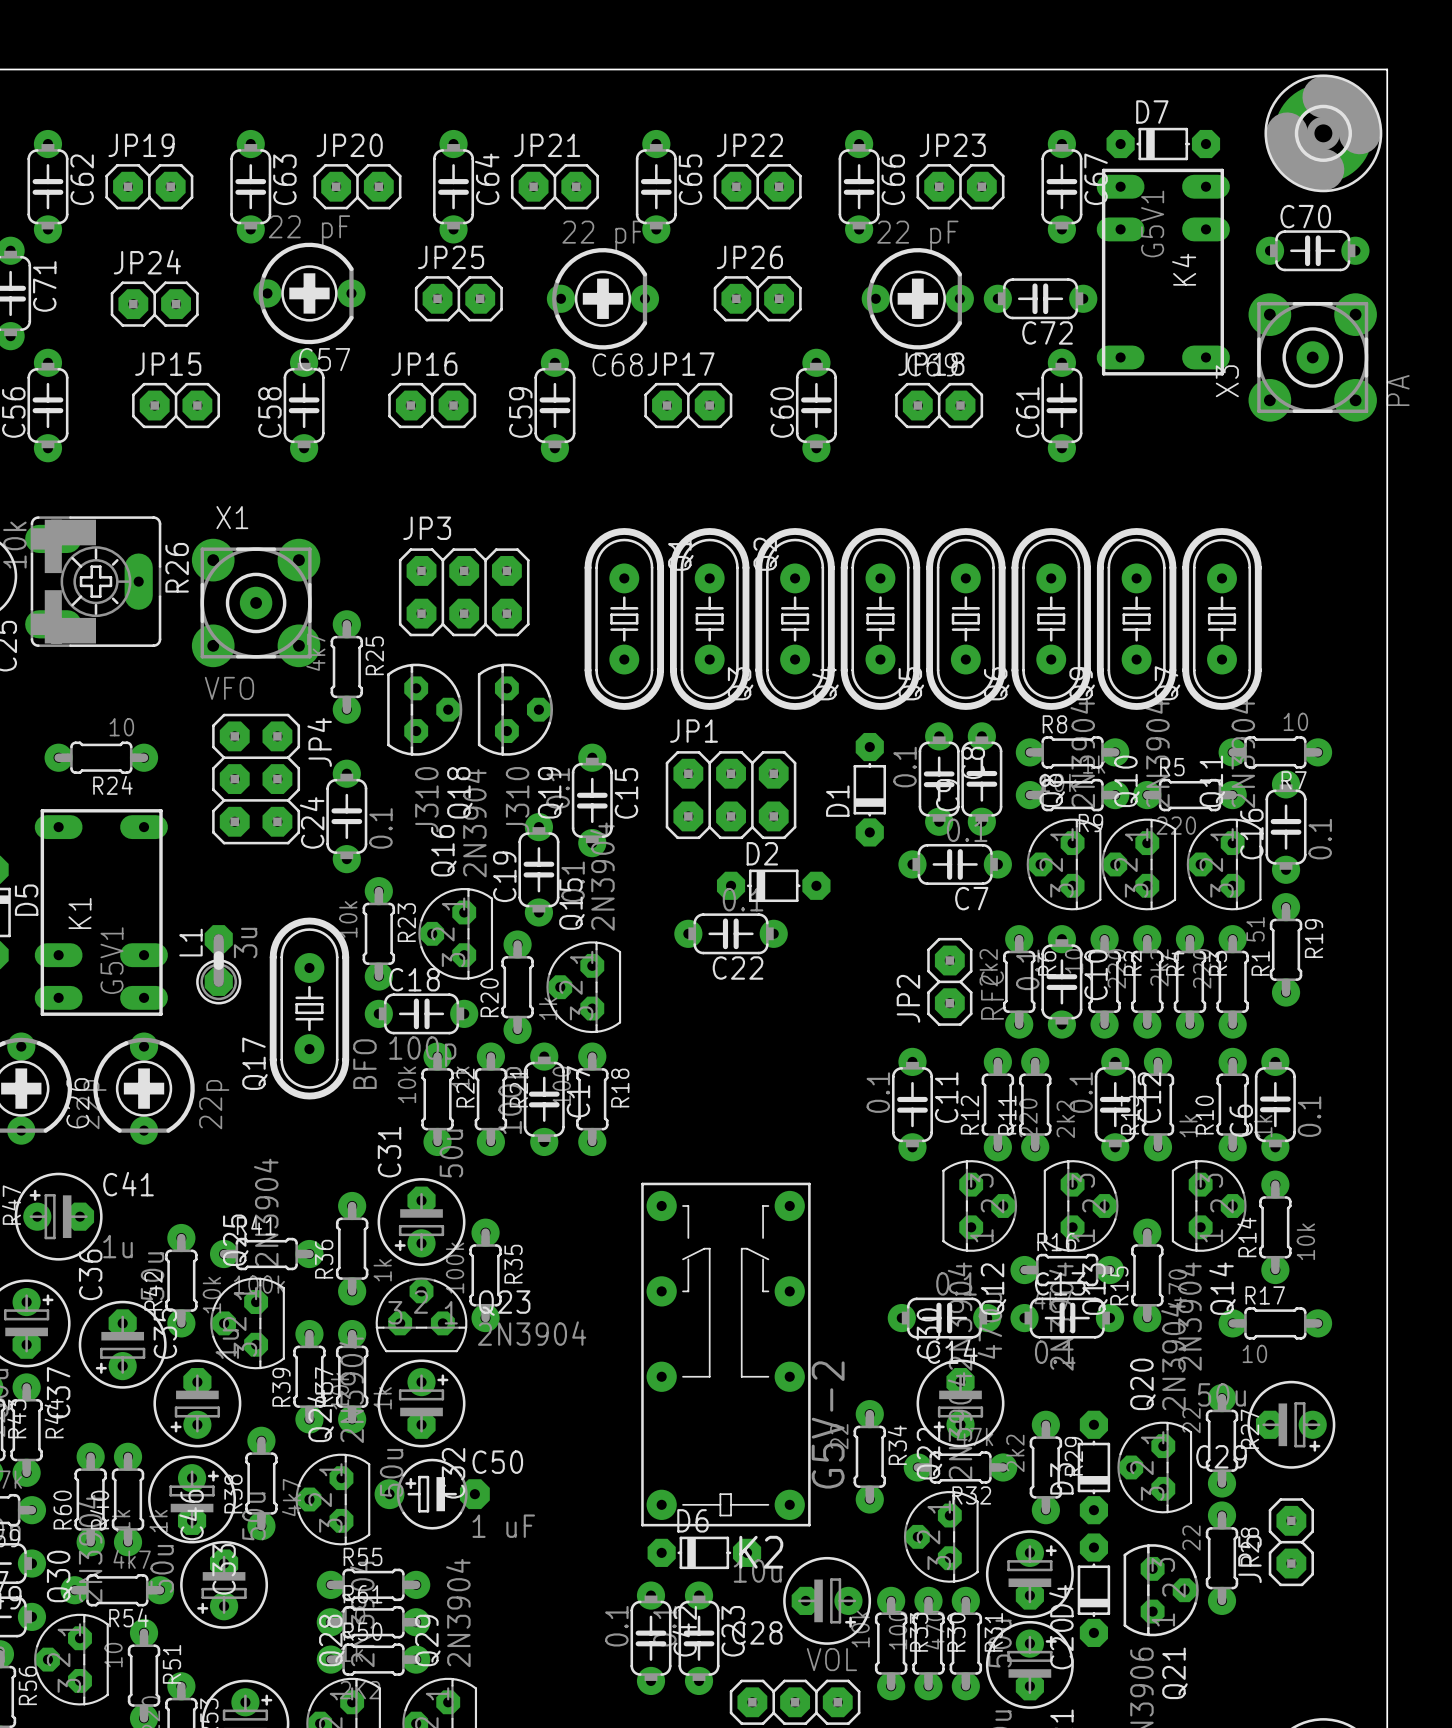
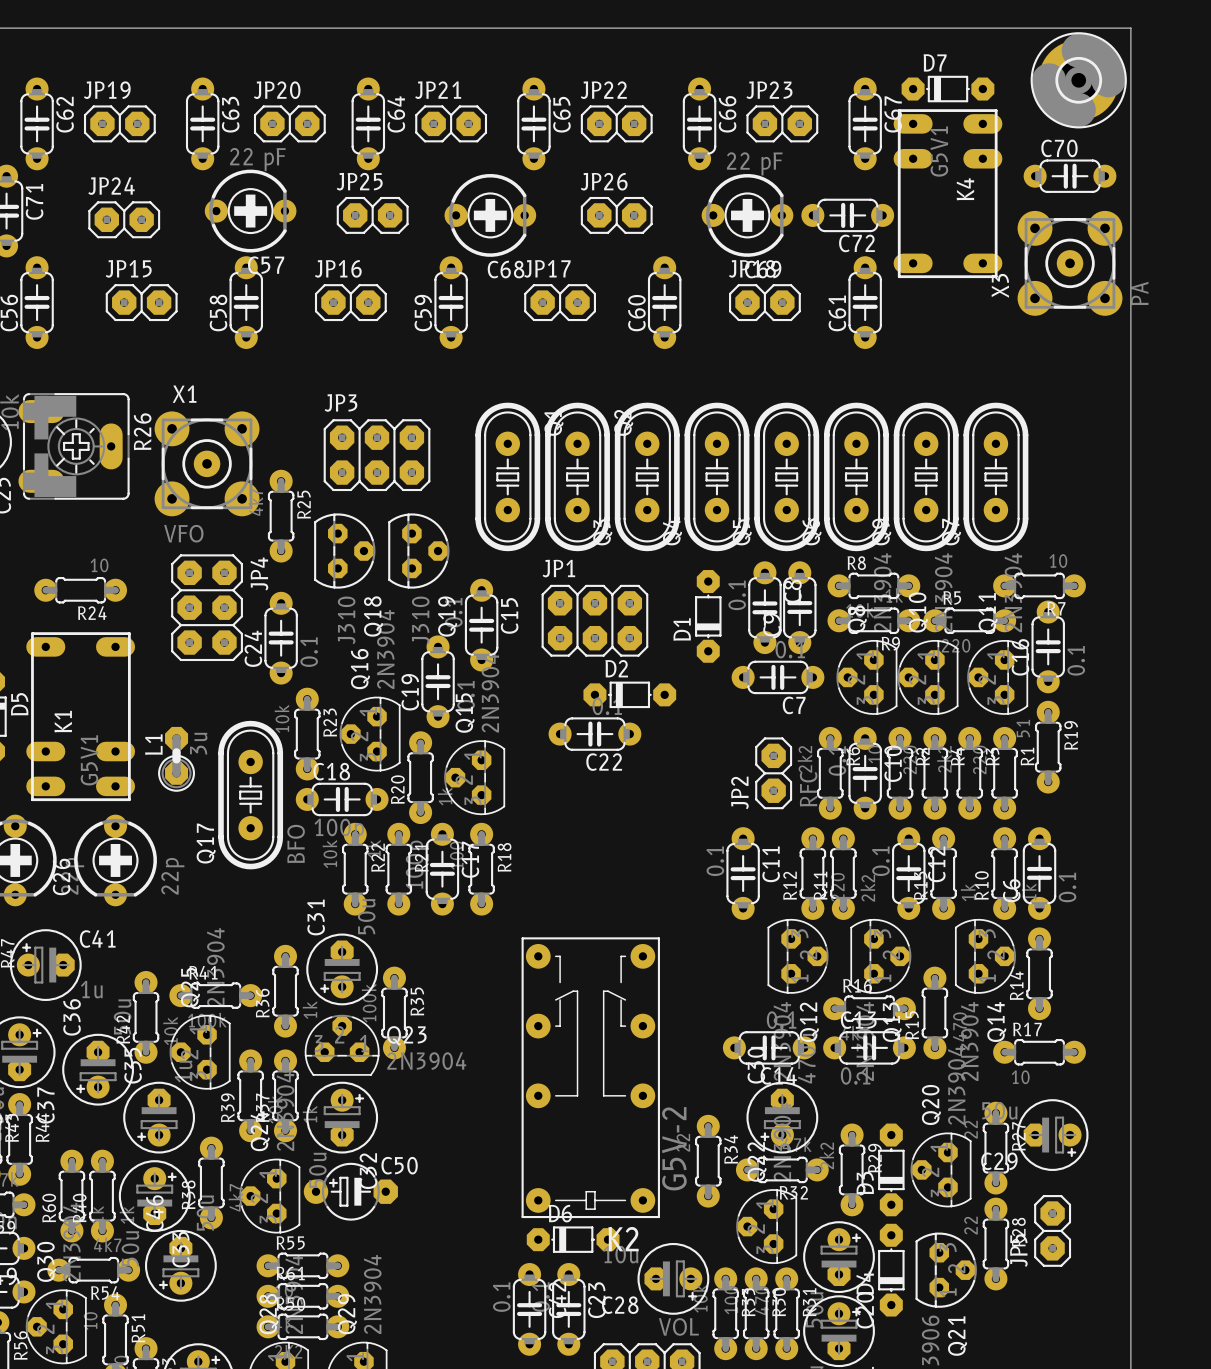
C68 value: 22 pF (603, 235) -> none
R14 value: 10k (1305, 1241) -> none
C50 value: 1 uF (503, 1526) -> none

